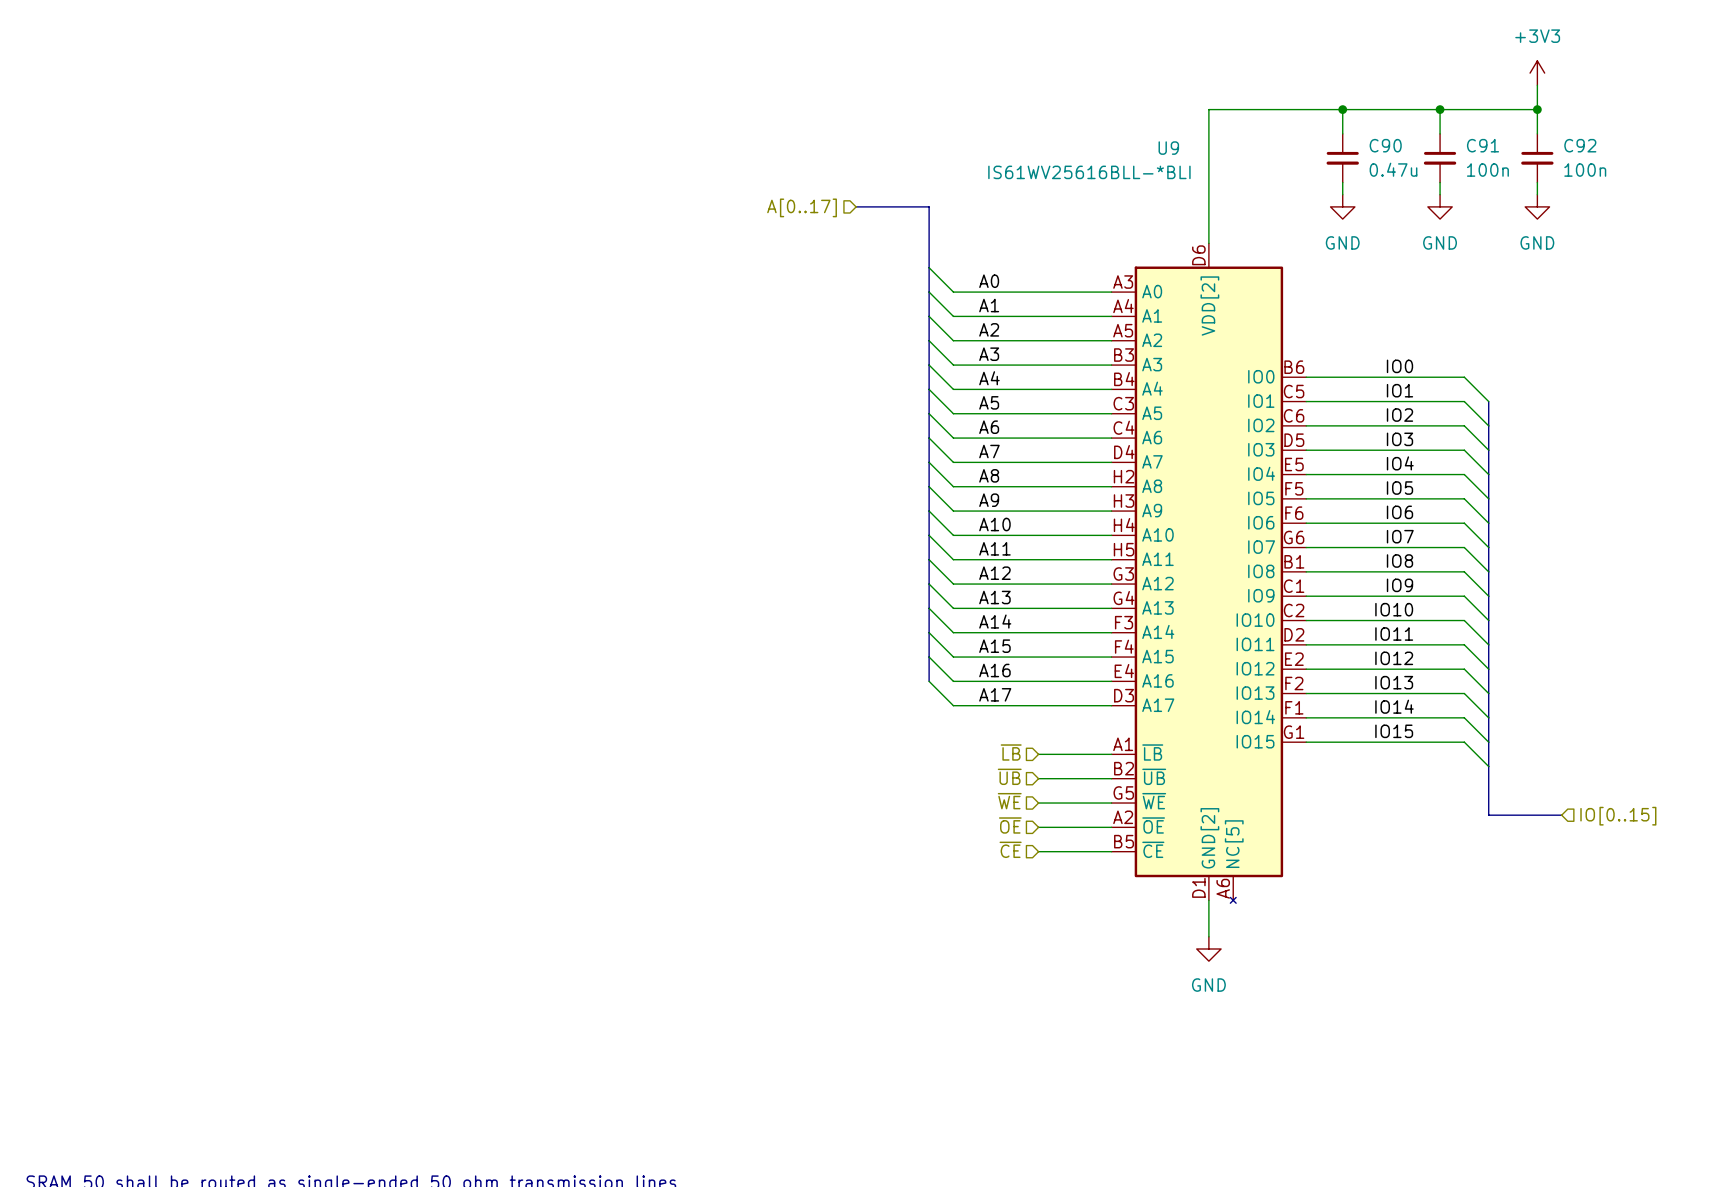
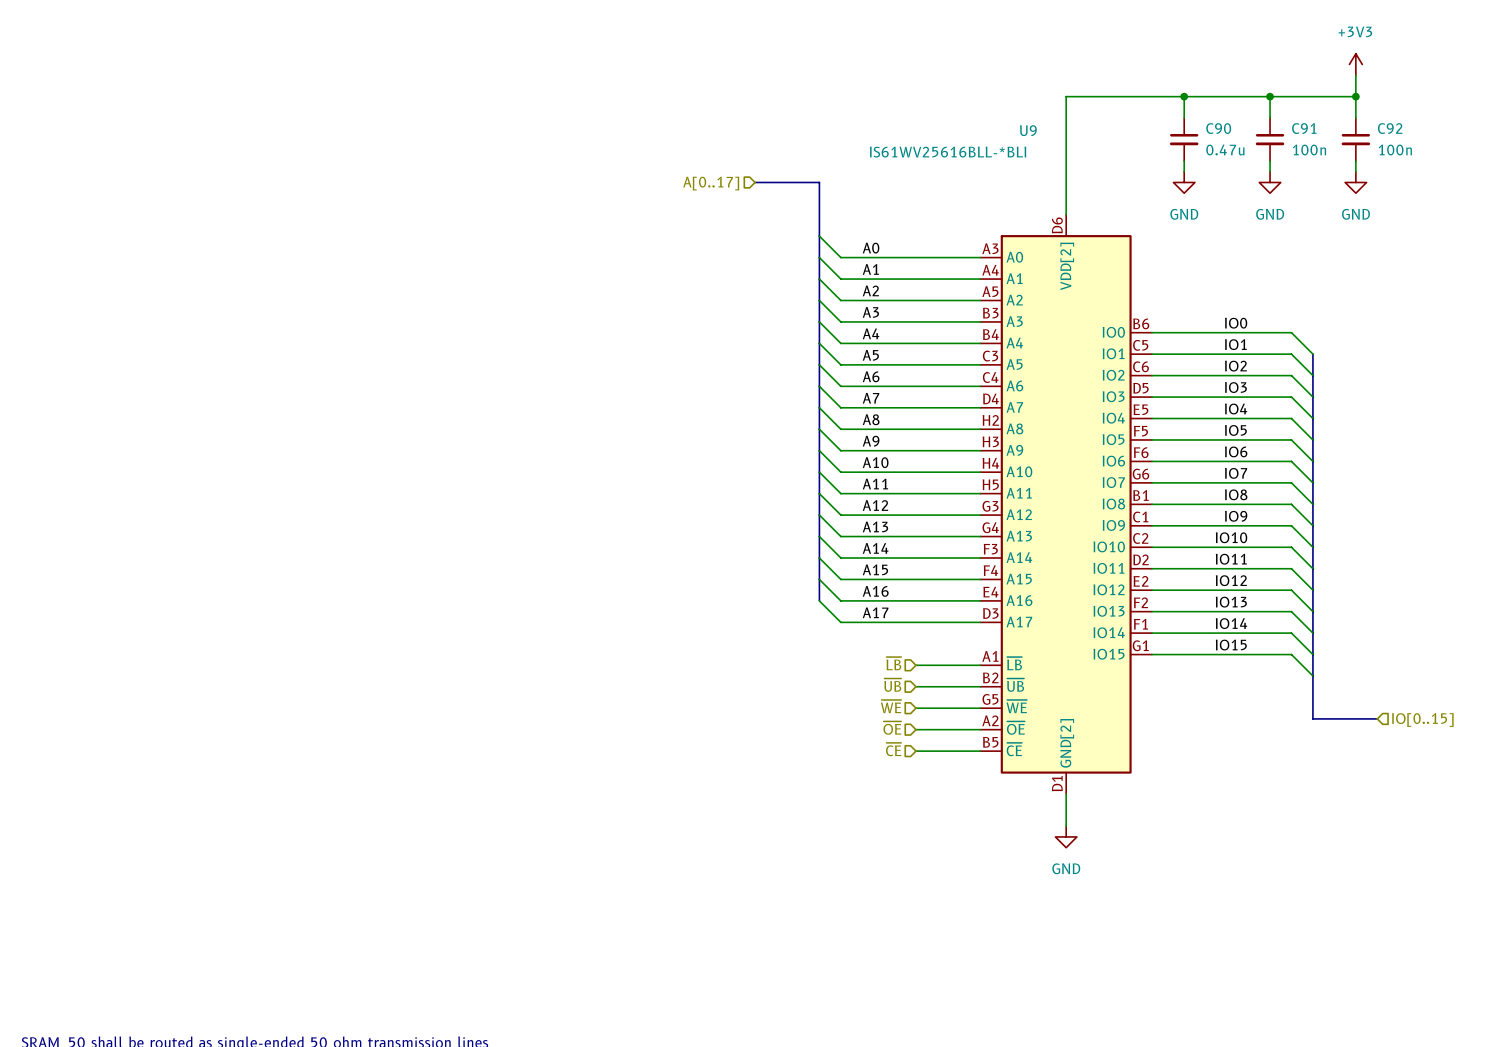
U9 symbol: [1111, 243, 1307, 904] -> [980, 214, 1153, 795]

